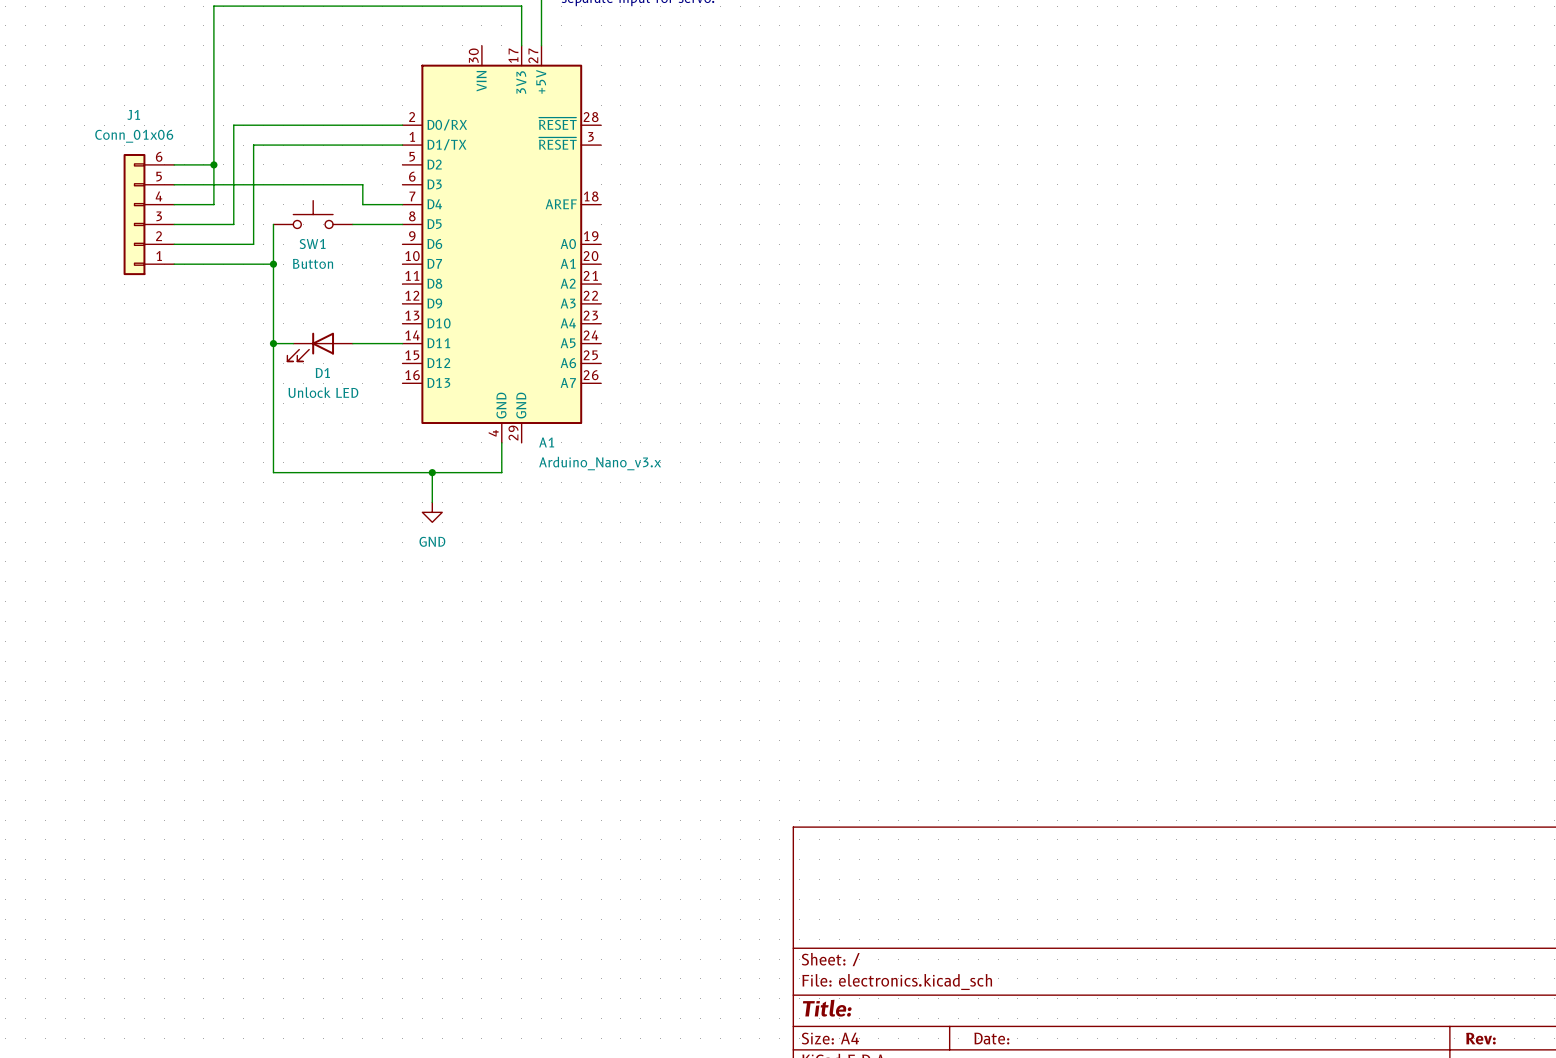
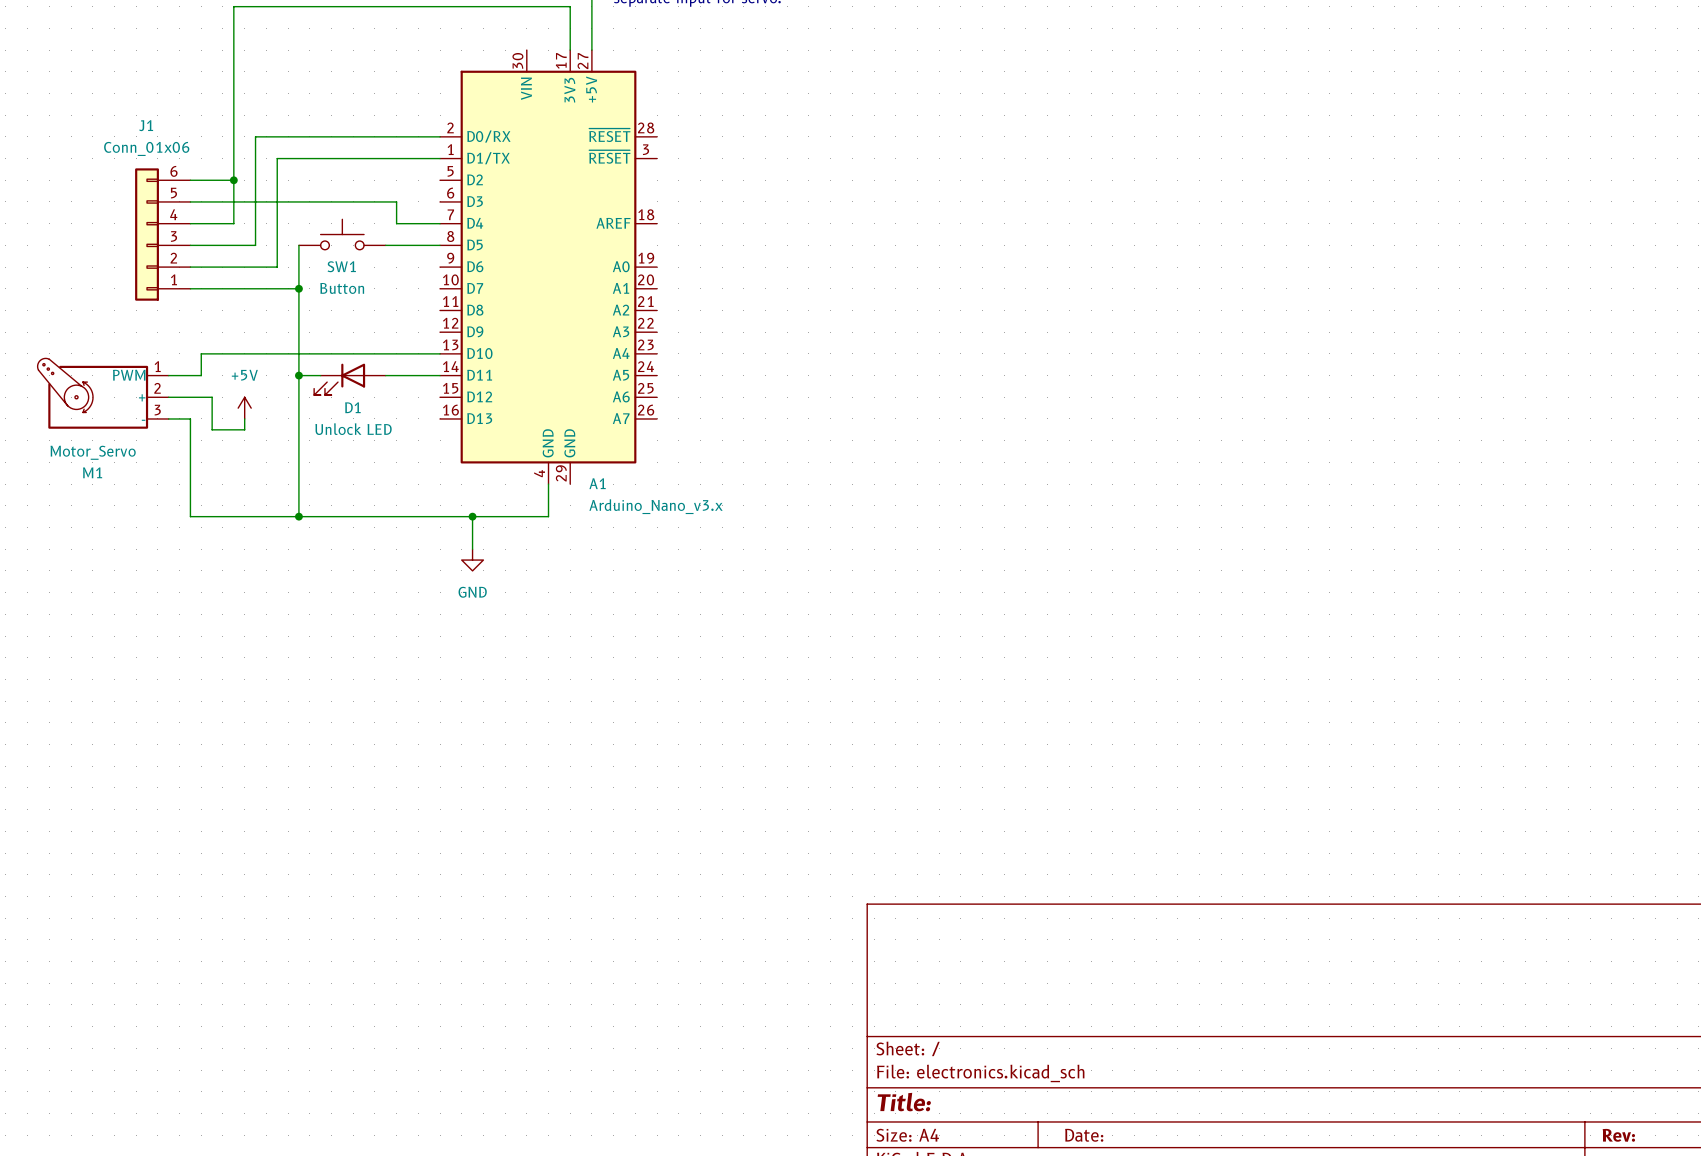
wire: none -> (440, 353) (201, 353) (201, 375) (168, 375)
M1: none -> Motor_Servo (103, 393)
wire: none -> (168, 397) (212, 397) (212, 429) (244, 429) (244, 418)
power symbol: none -> +5V (244, 408)
wire: none -> (168, 418) (190, 418) (190, 516) (298, 516)
junction: none -> (298, 516)

